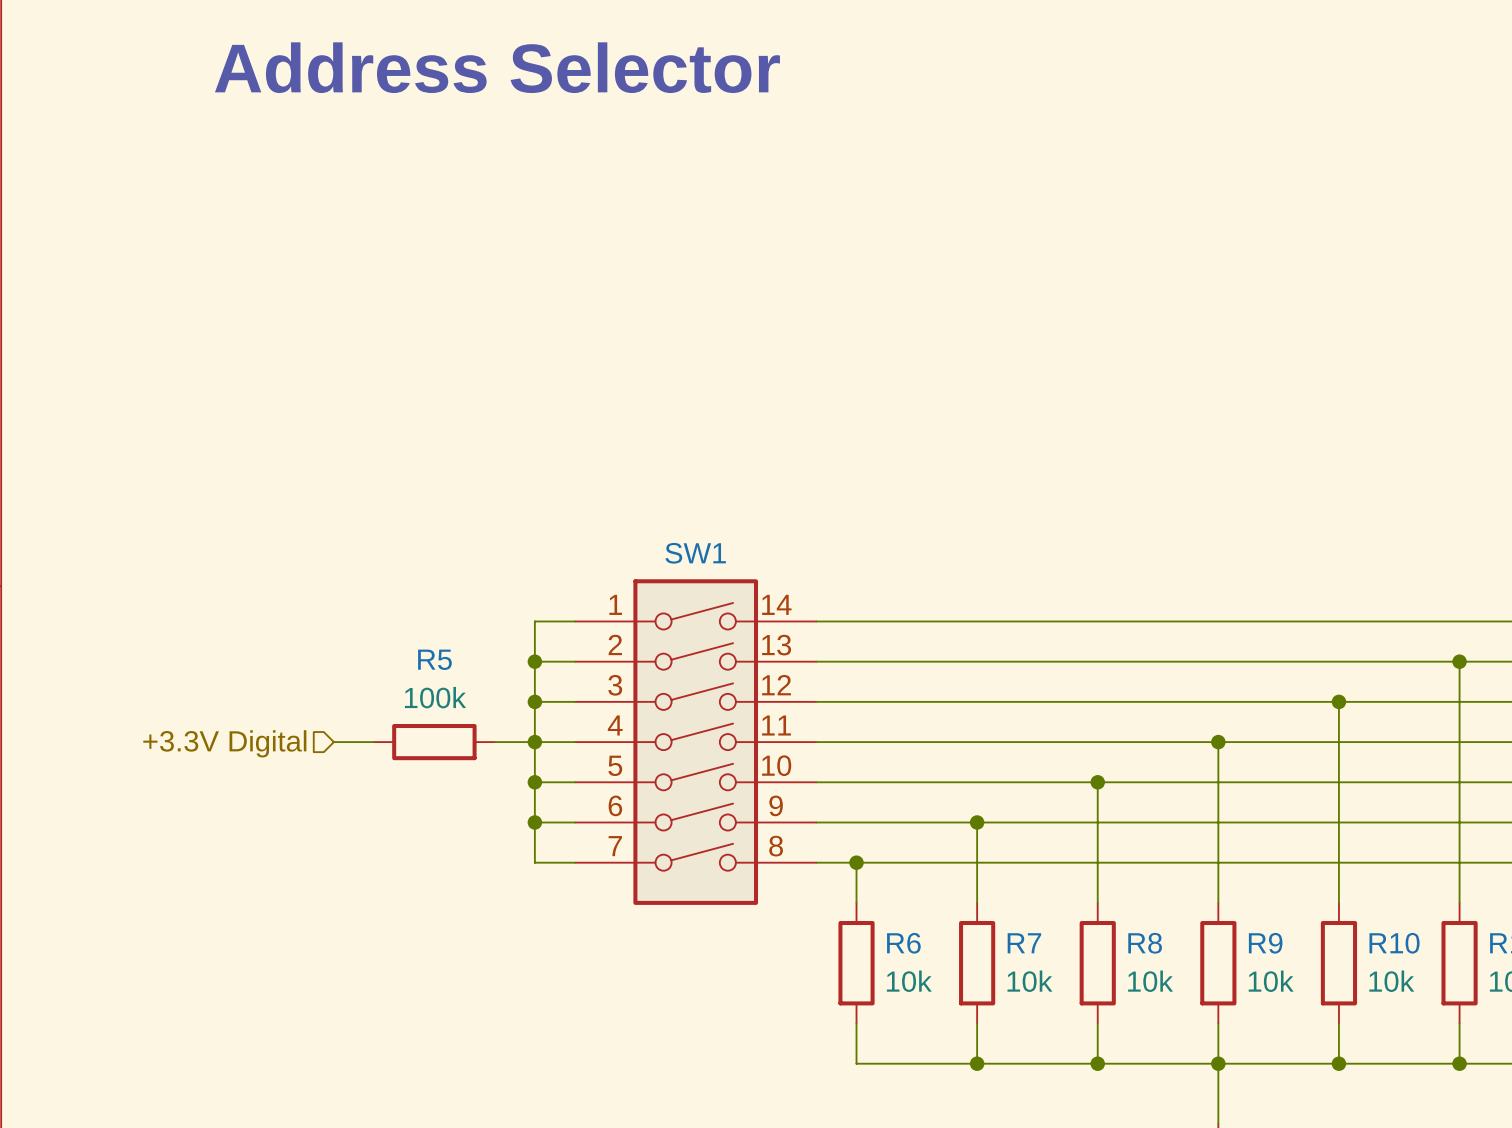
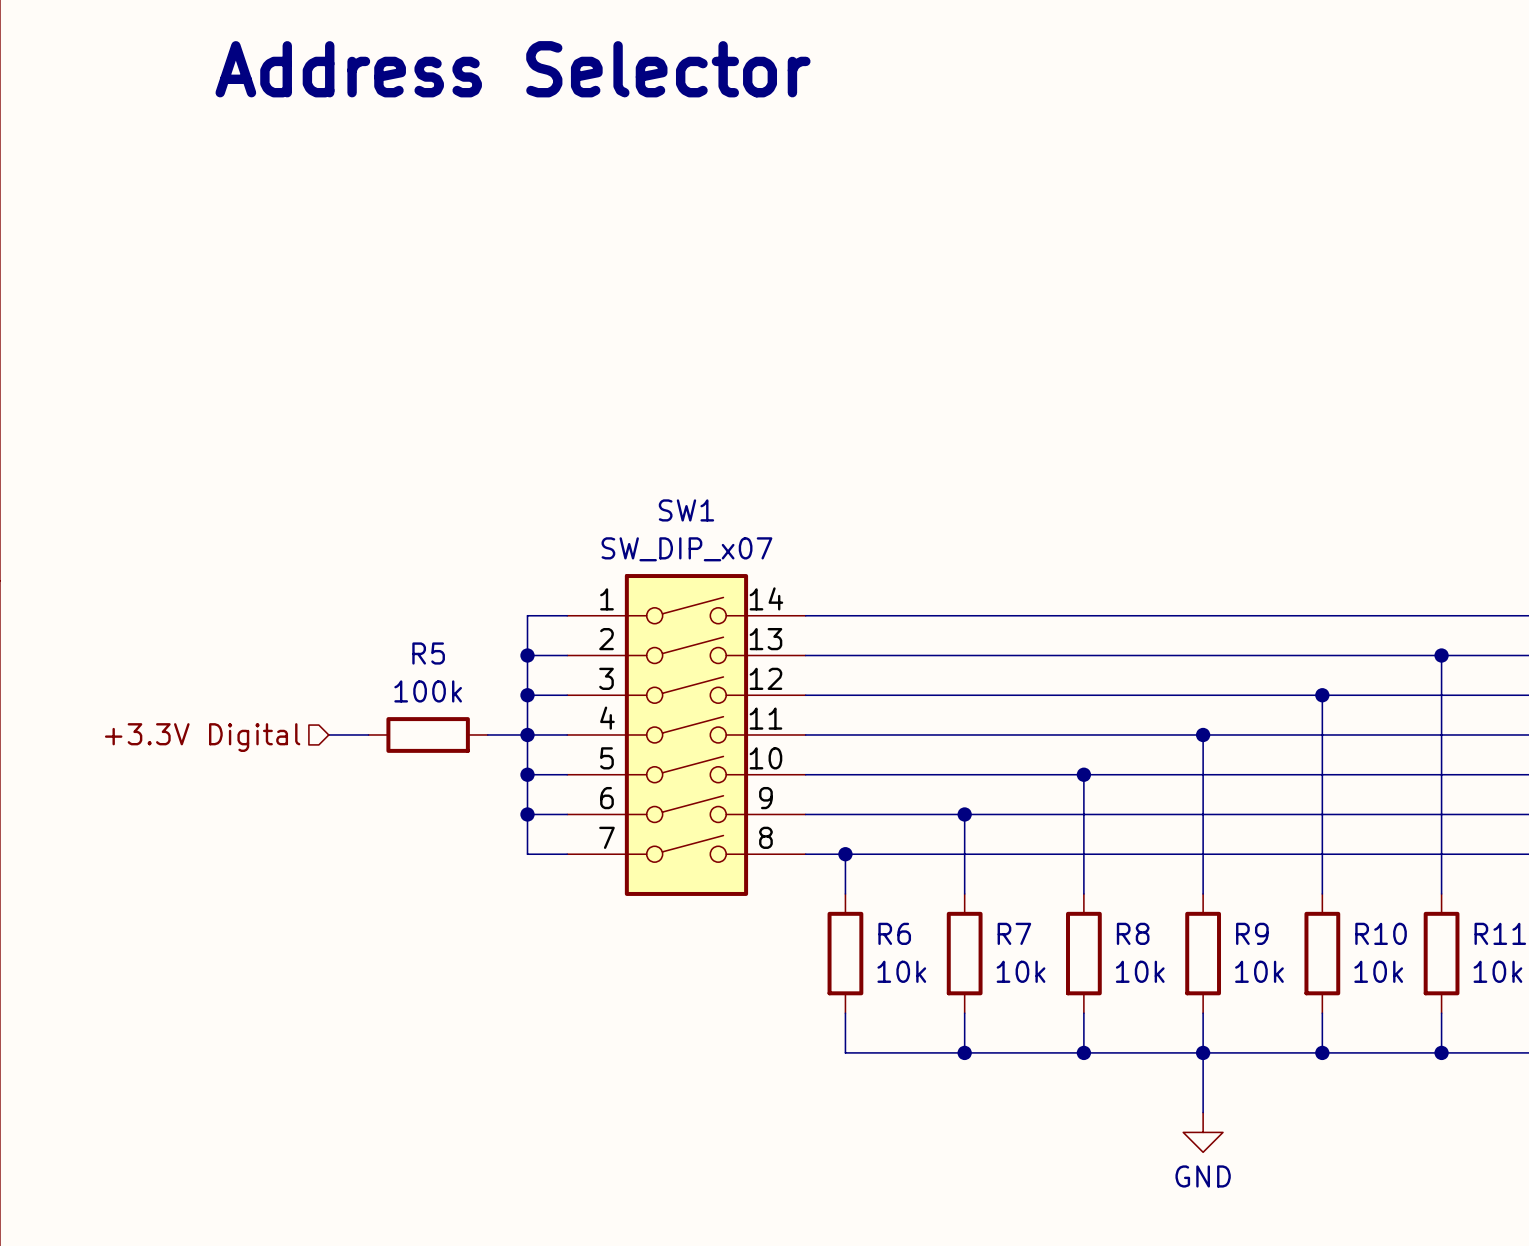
SW1 name position: SW1 (695, 553) -> SW1 (686, 510)
SW1 value: none -> SW_DIP_x07 (686, 549)

